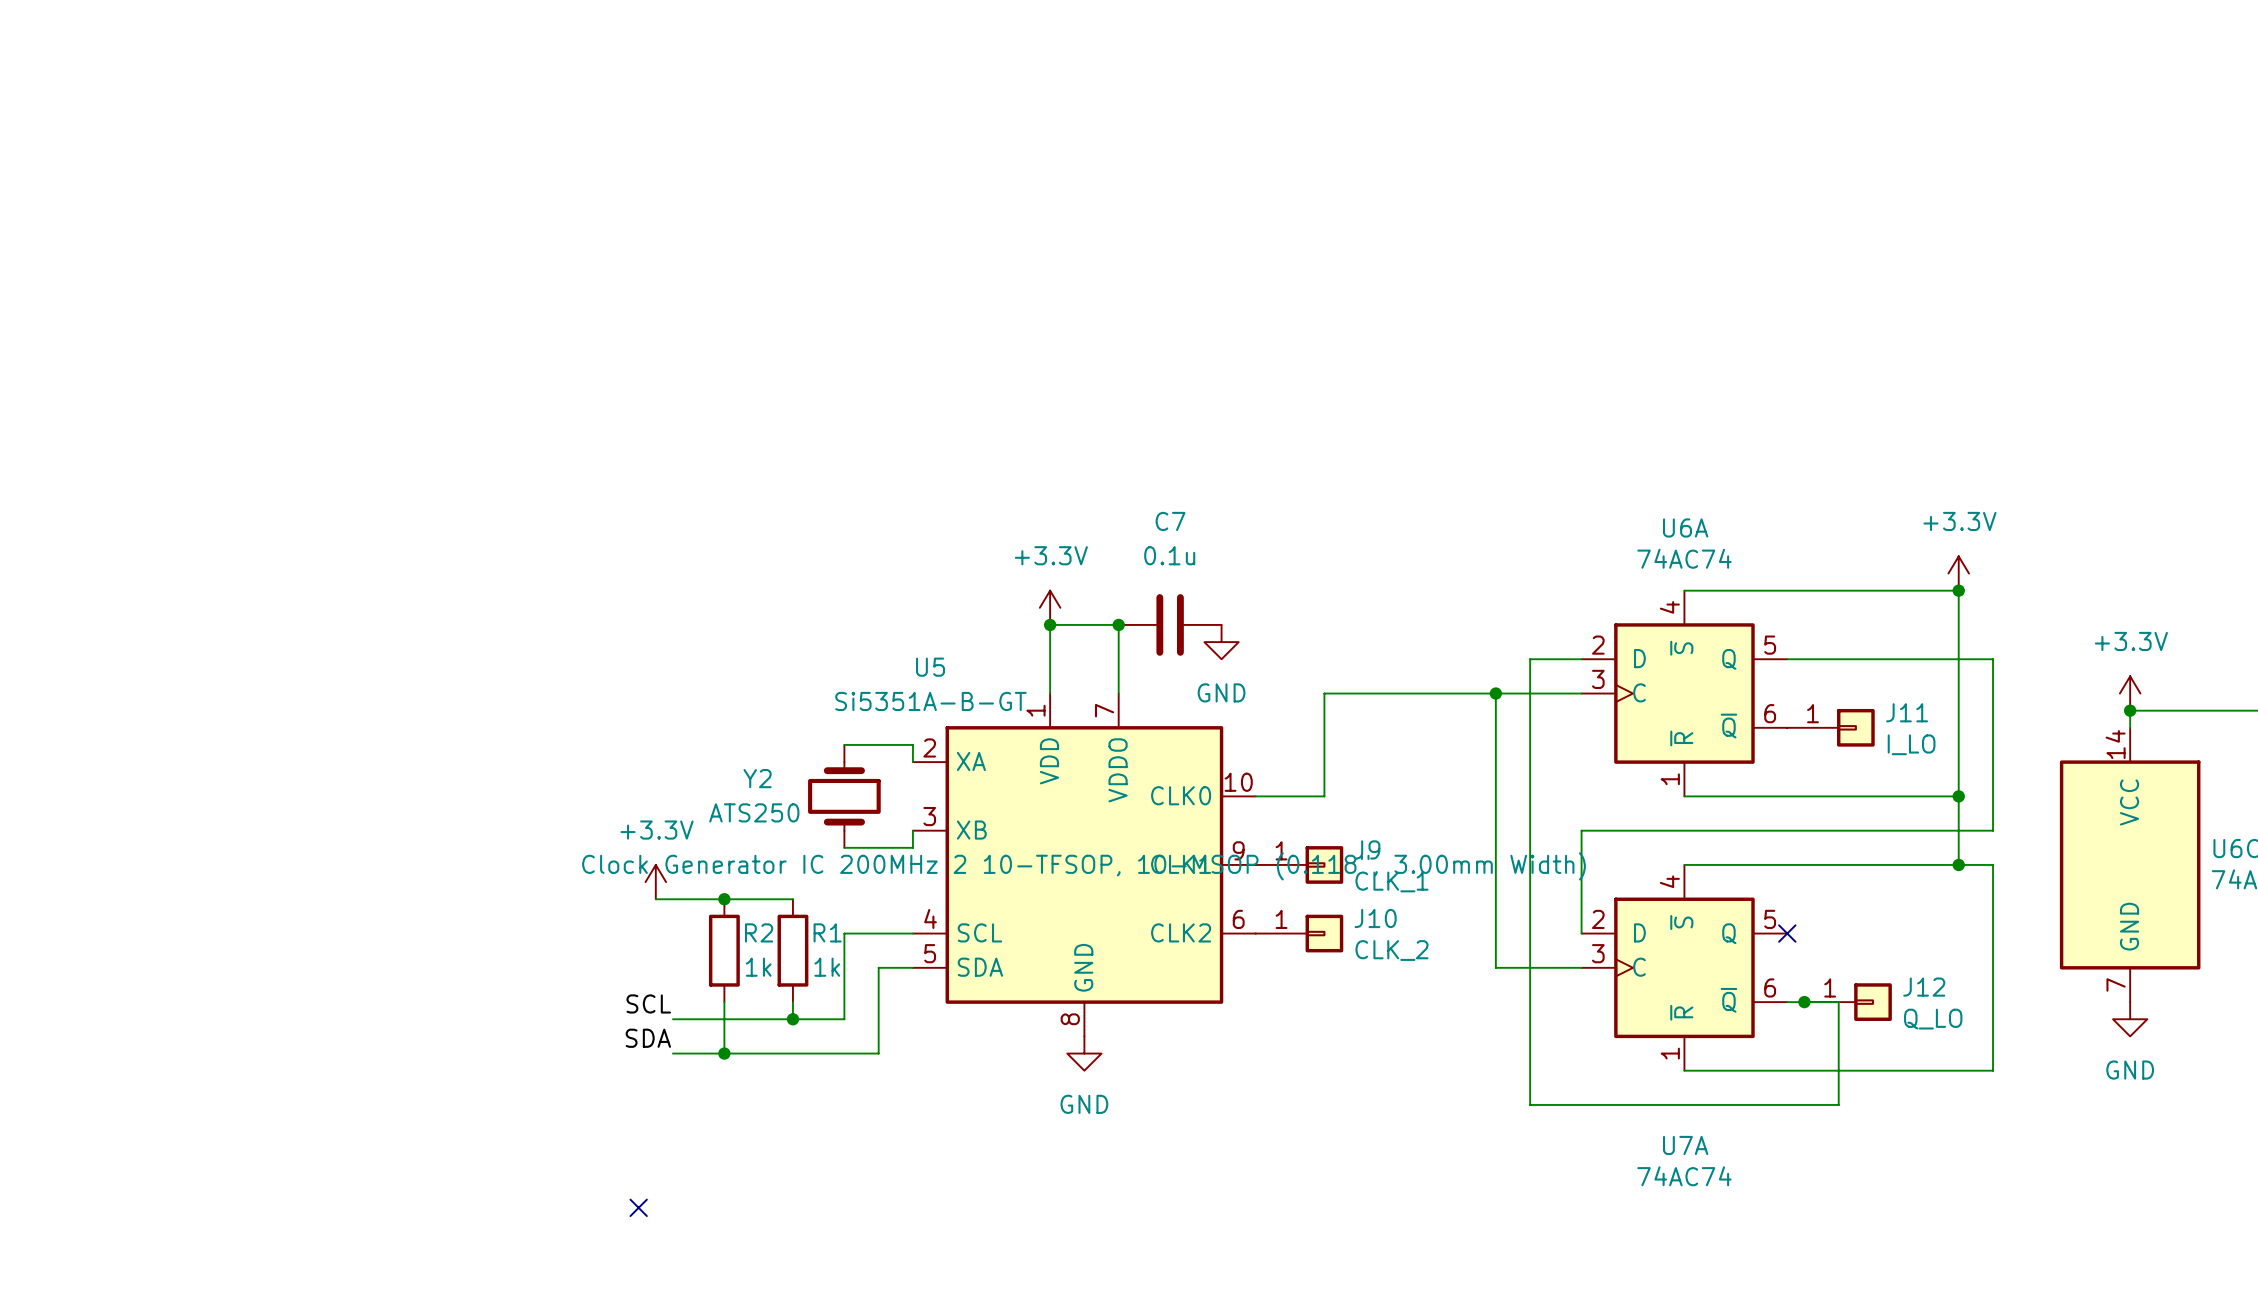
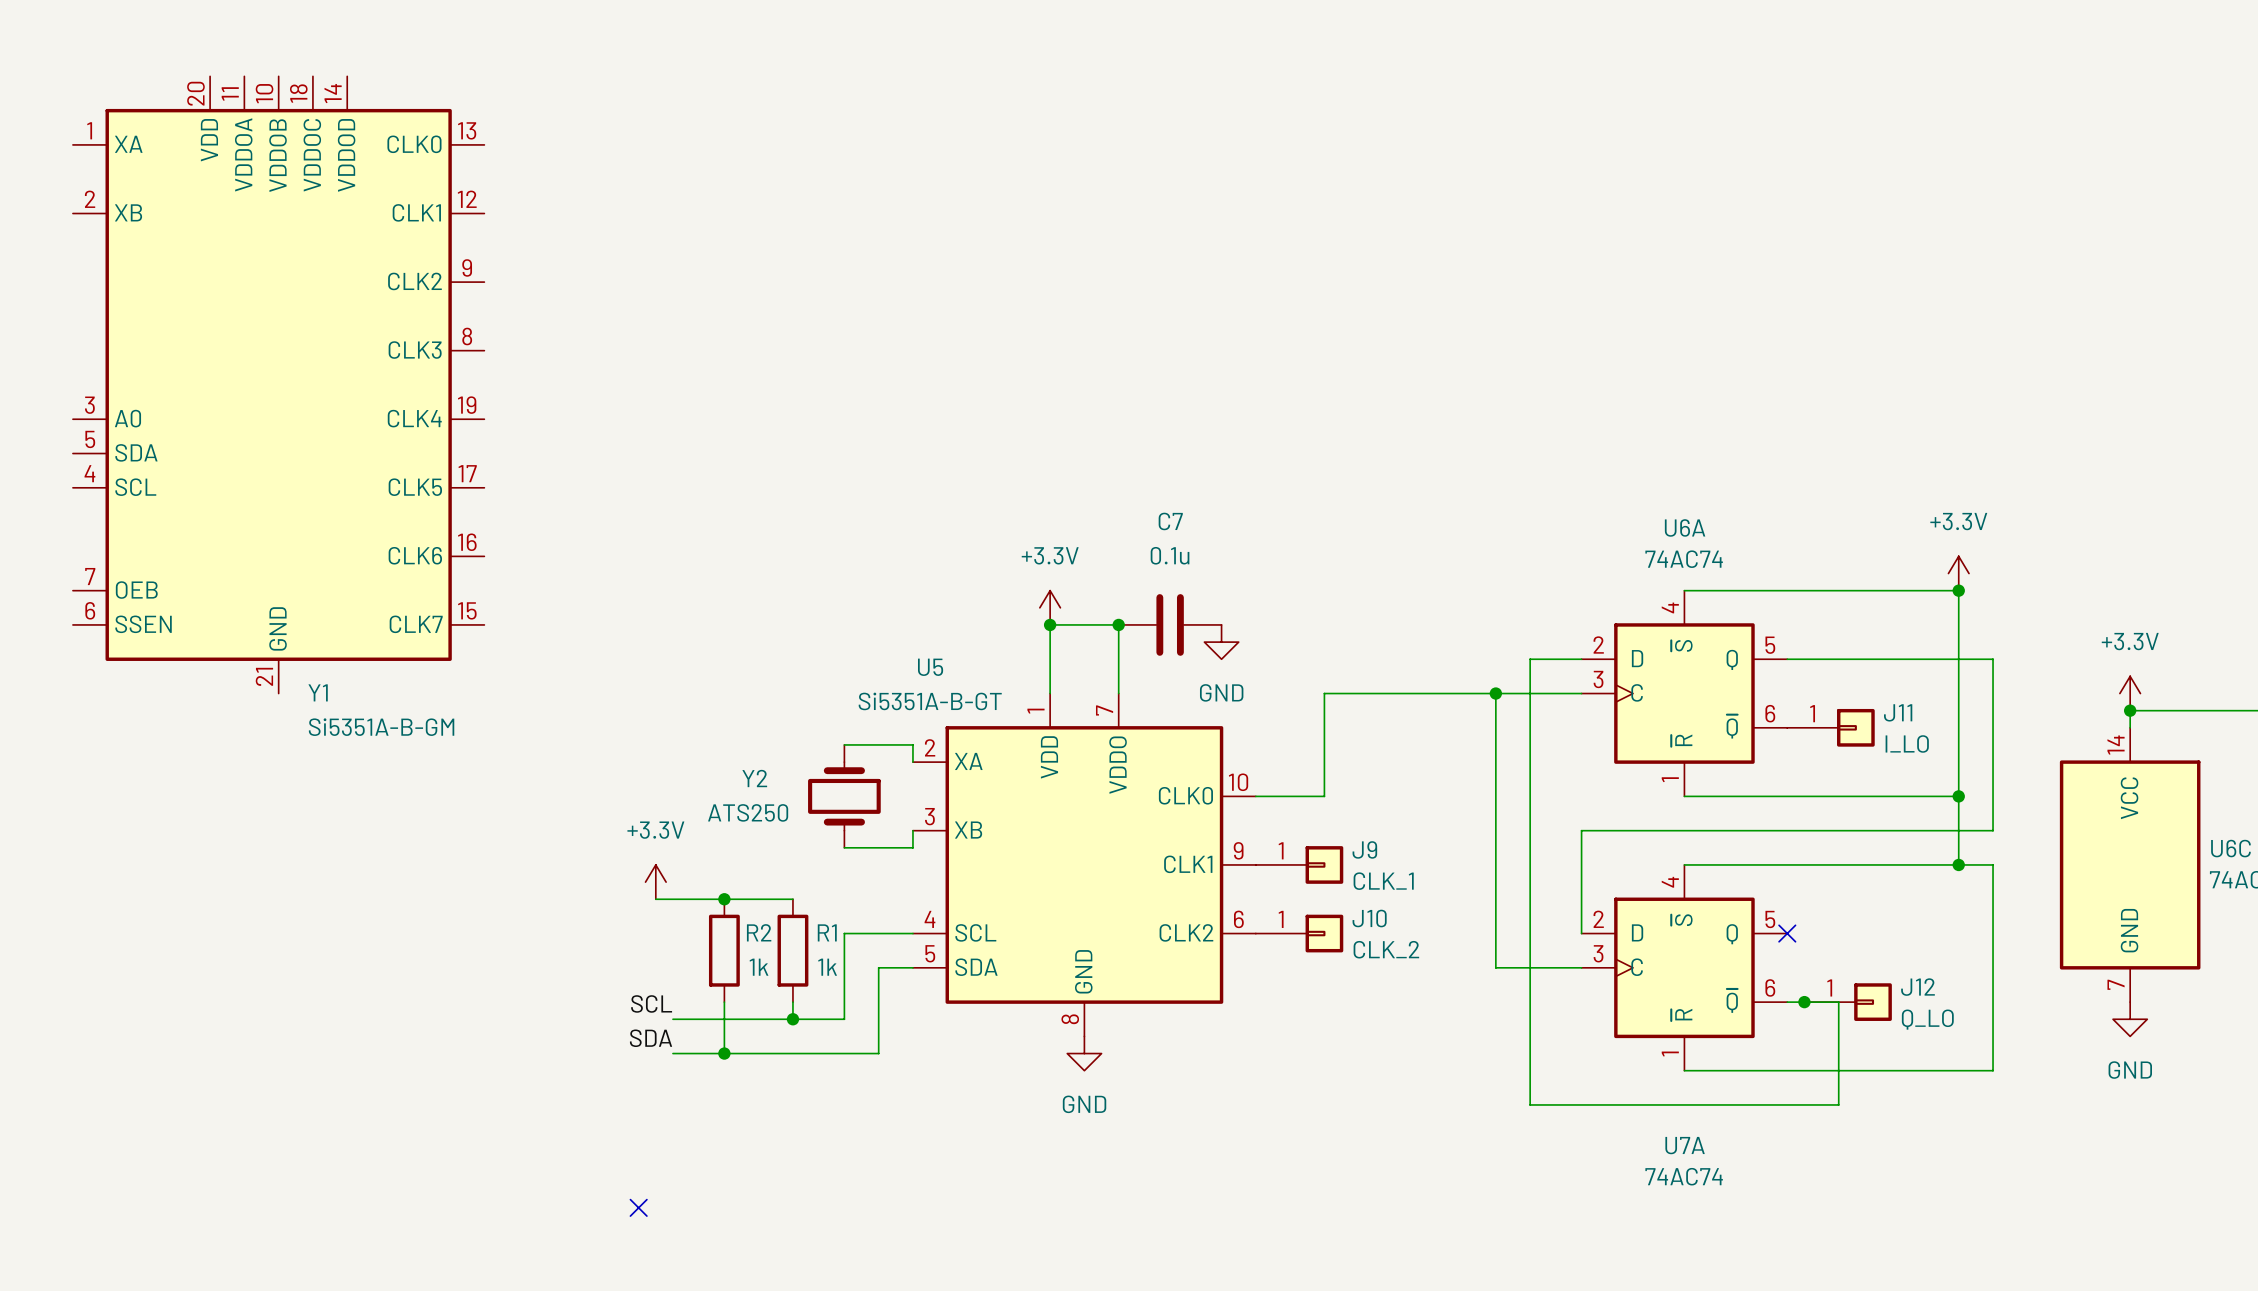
Y1: none -> Si5351A-B-GM (278, 384)
U5 text: Clock Generator IC 200MHz 2 10-TFSOP, 10-MSOP (0.118", 3.00mm Width) (1084, 866) -> none

